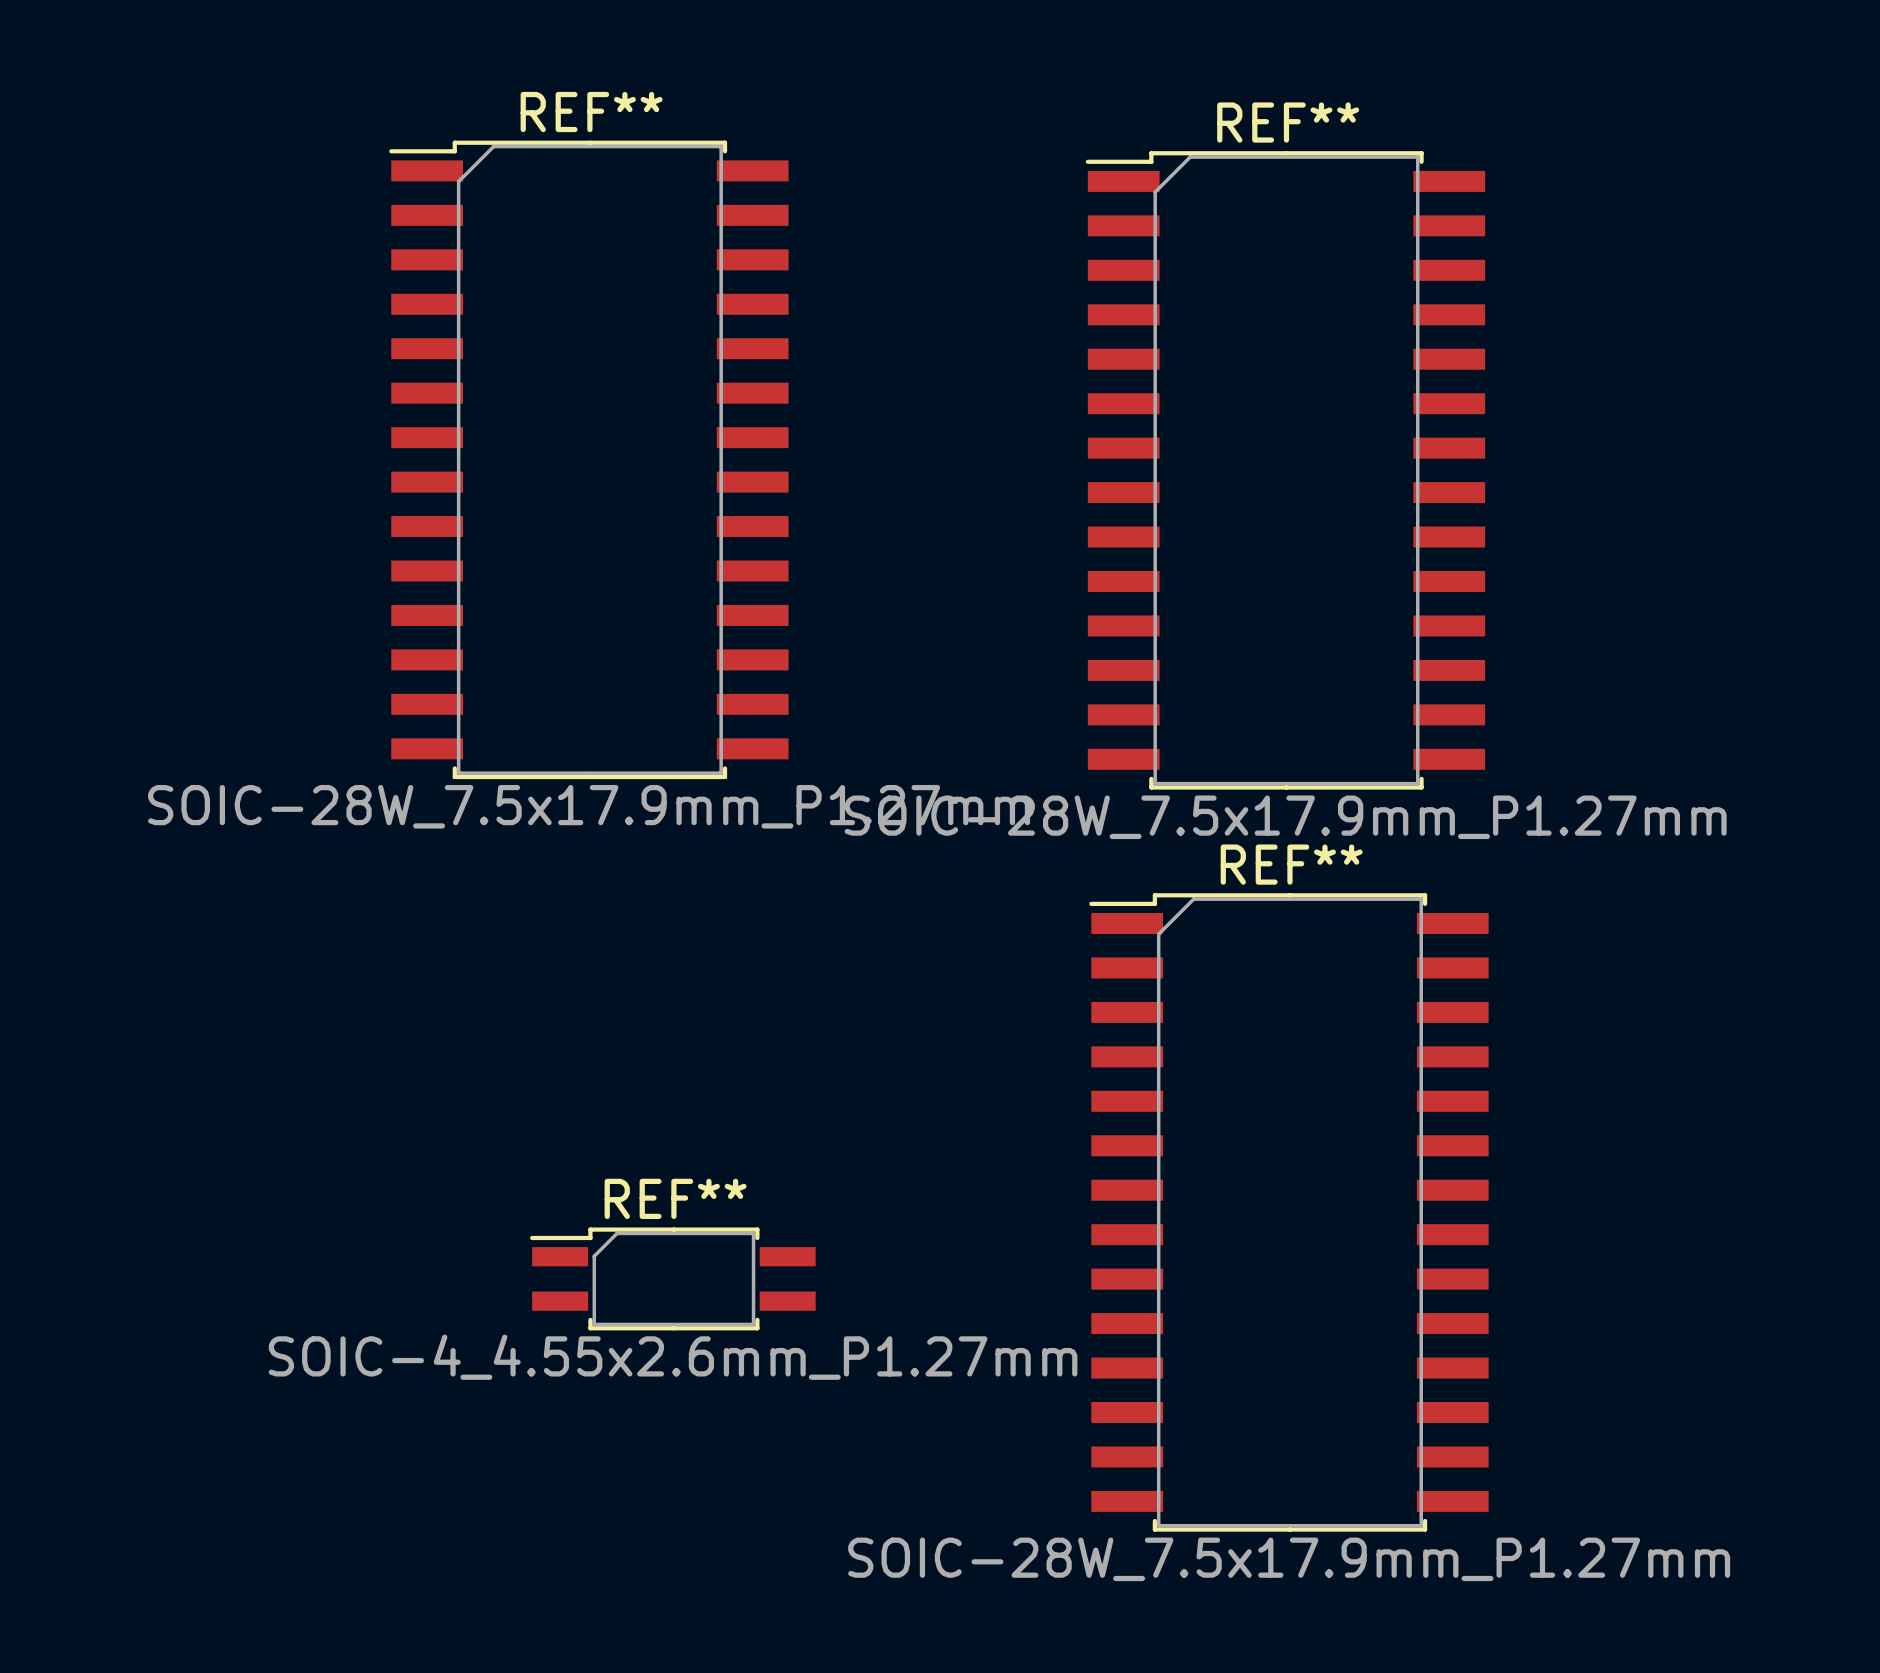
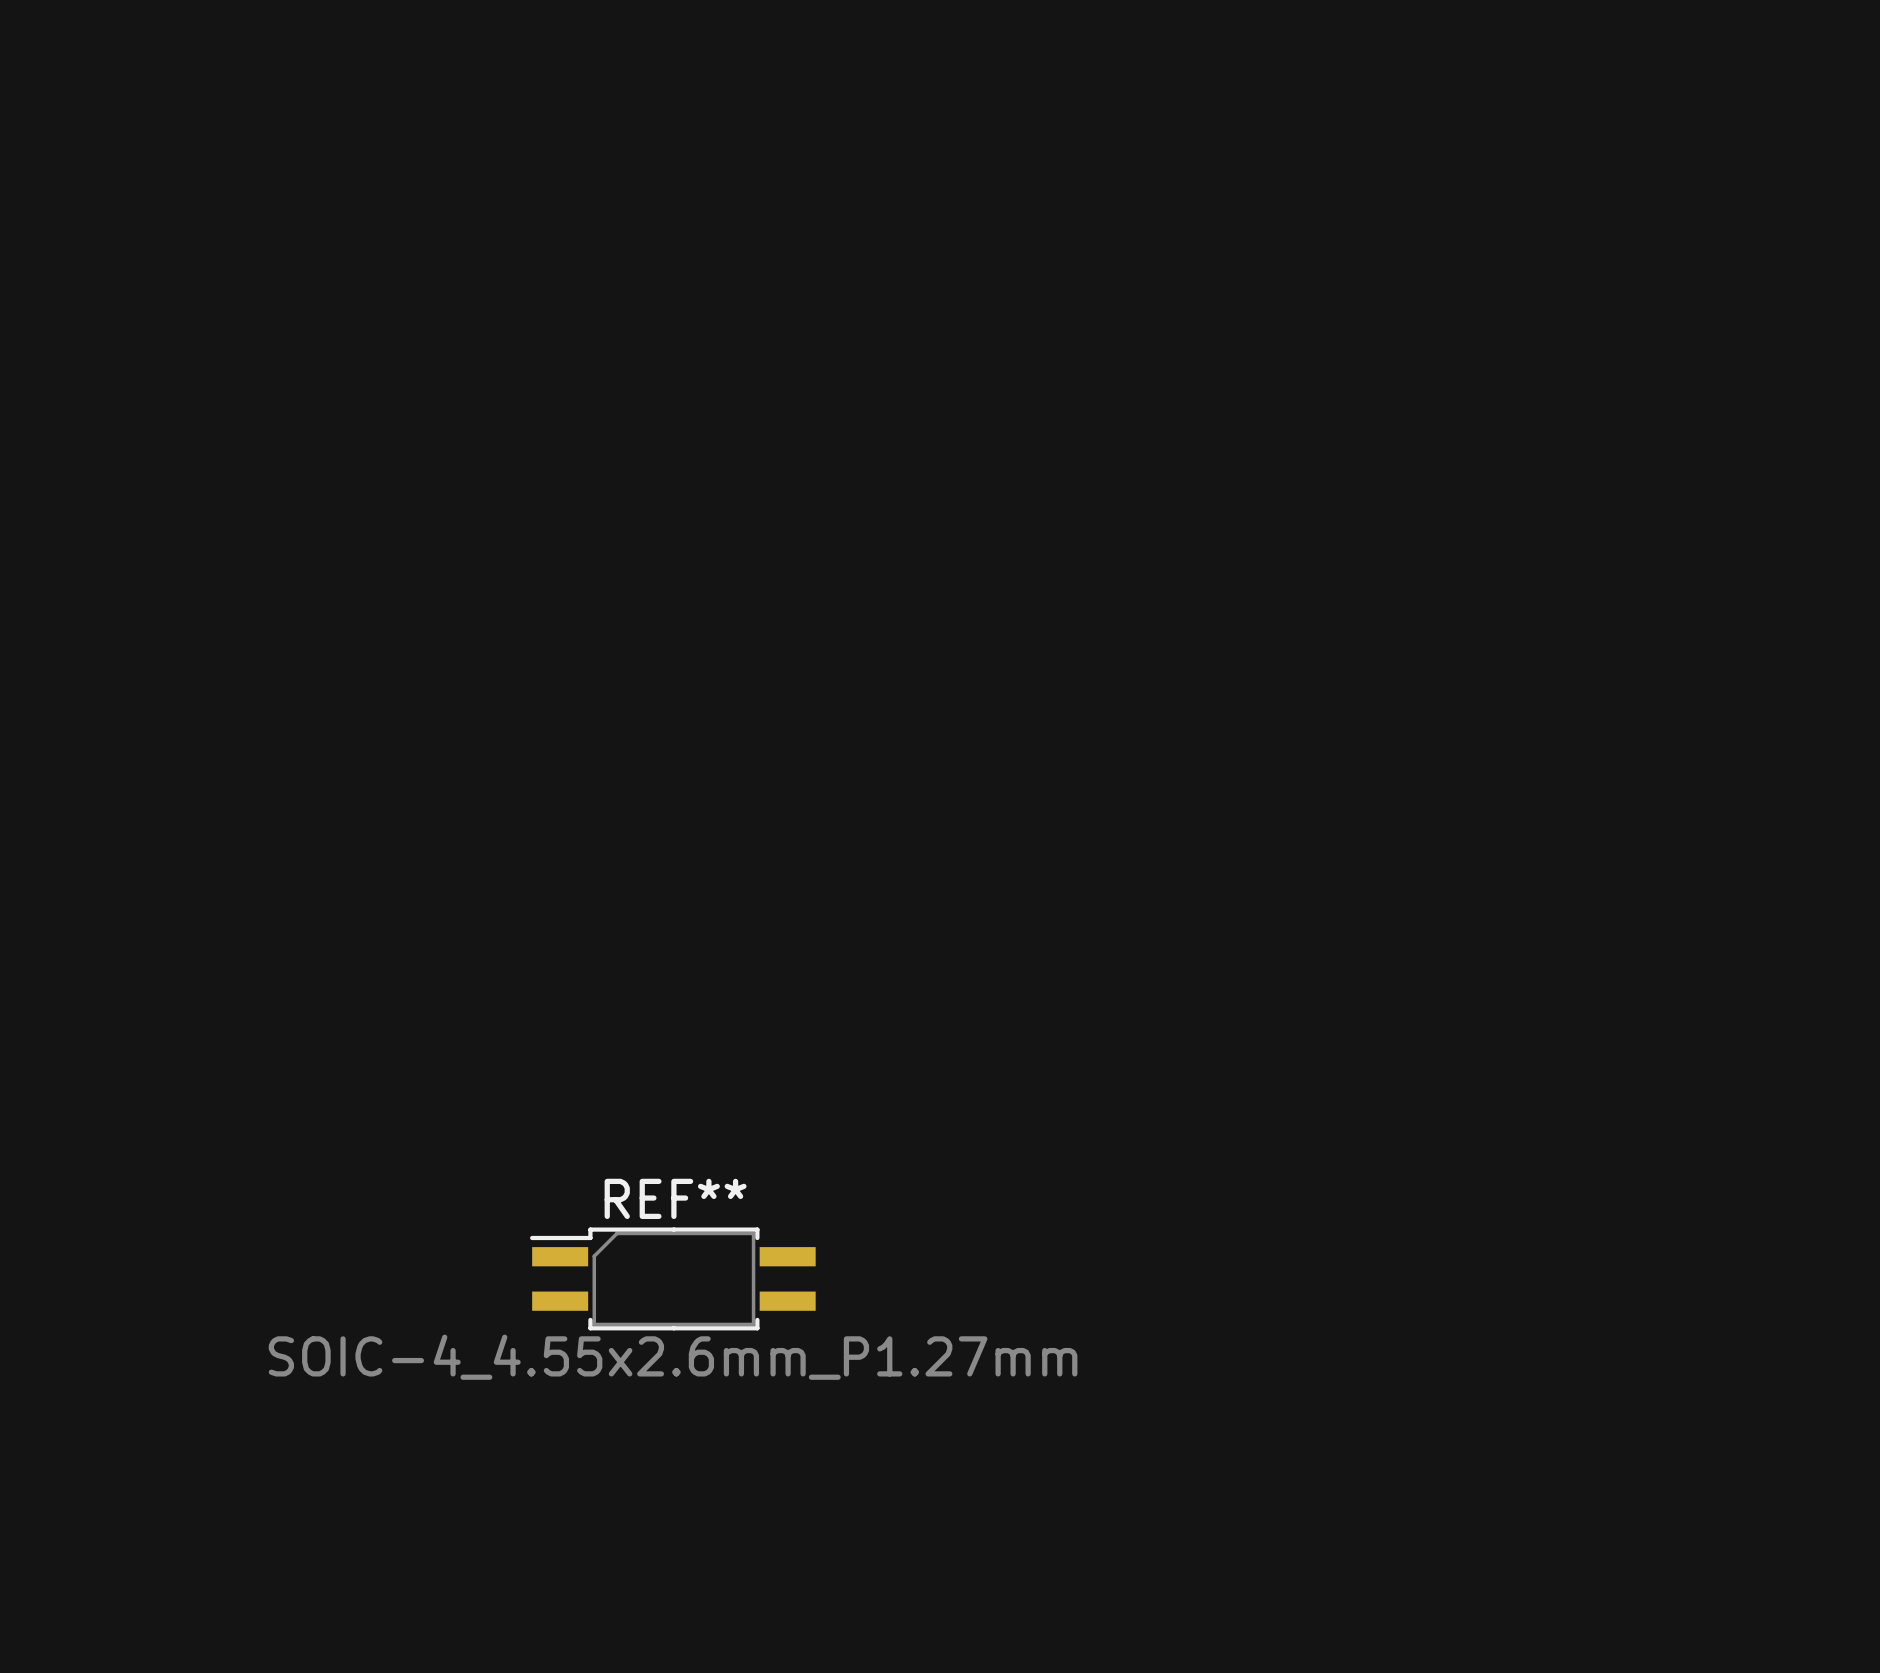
REF**: SOIC-28W_7.5x17.9mm_P1.27mm (588, 459) -> none
REF**: SOIC-28W_7.5x17.9mm_P1.27mm (1285, 470) -> none
REF**: SOIC-28W_7.5x17.9mm_P1.27mm (1288, 1212) -> none

